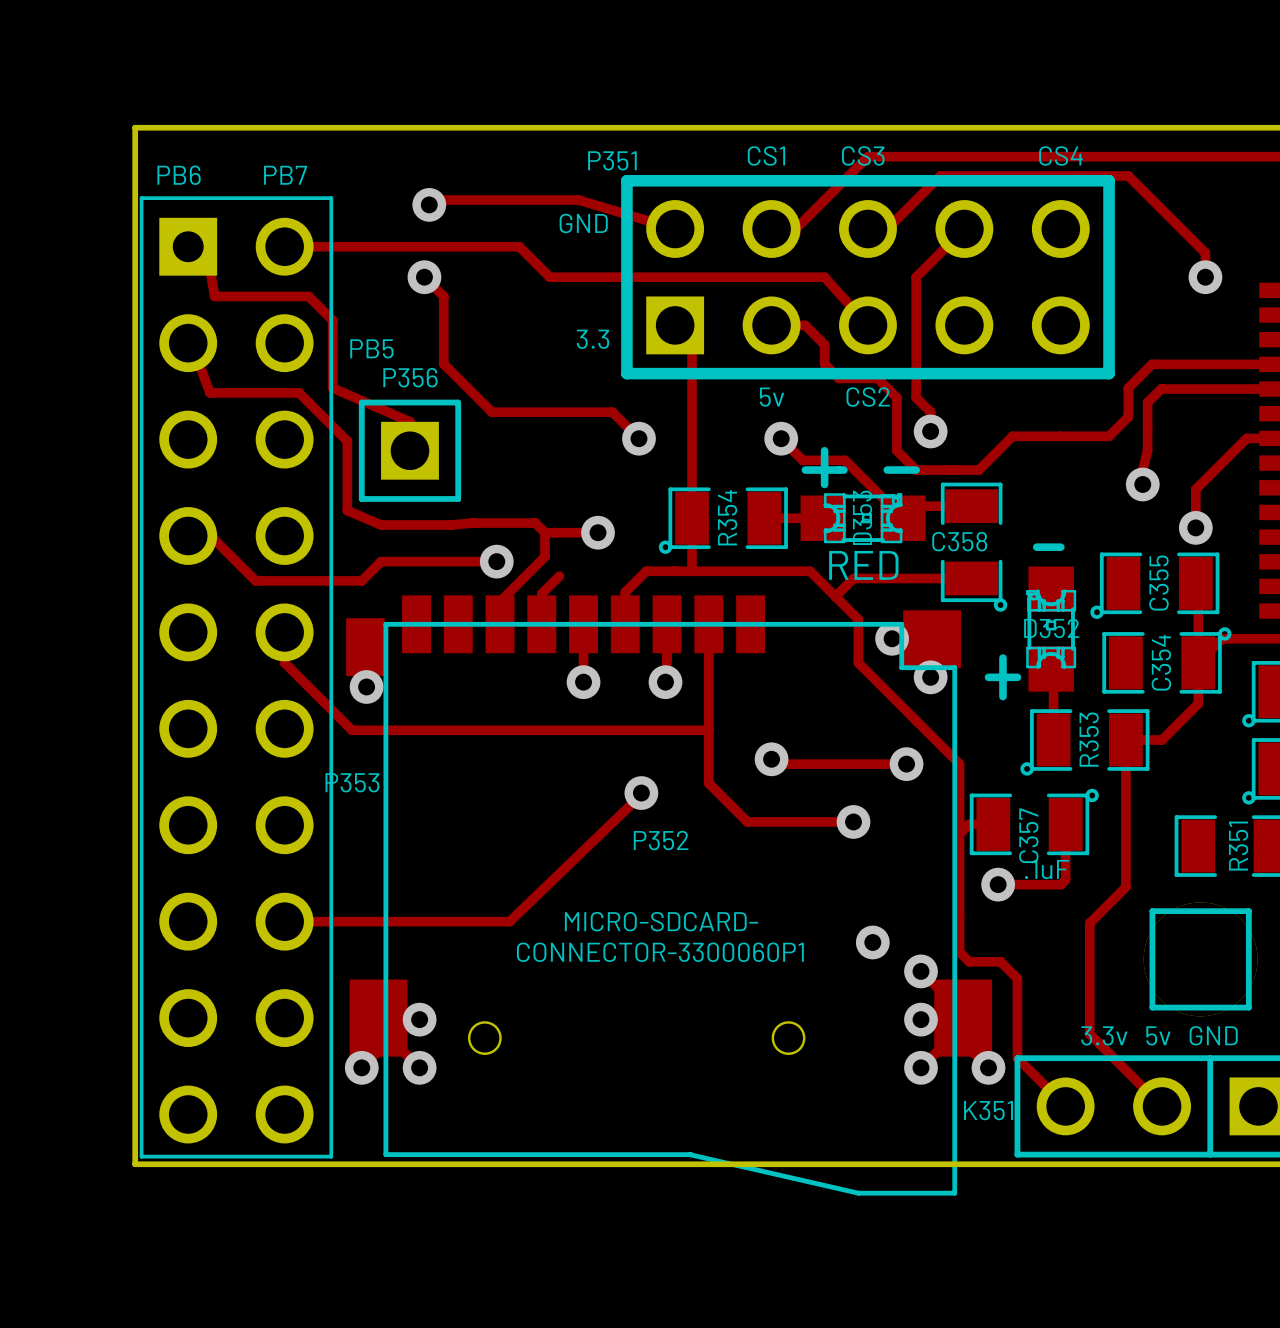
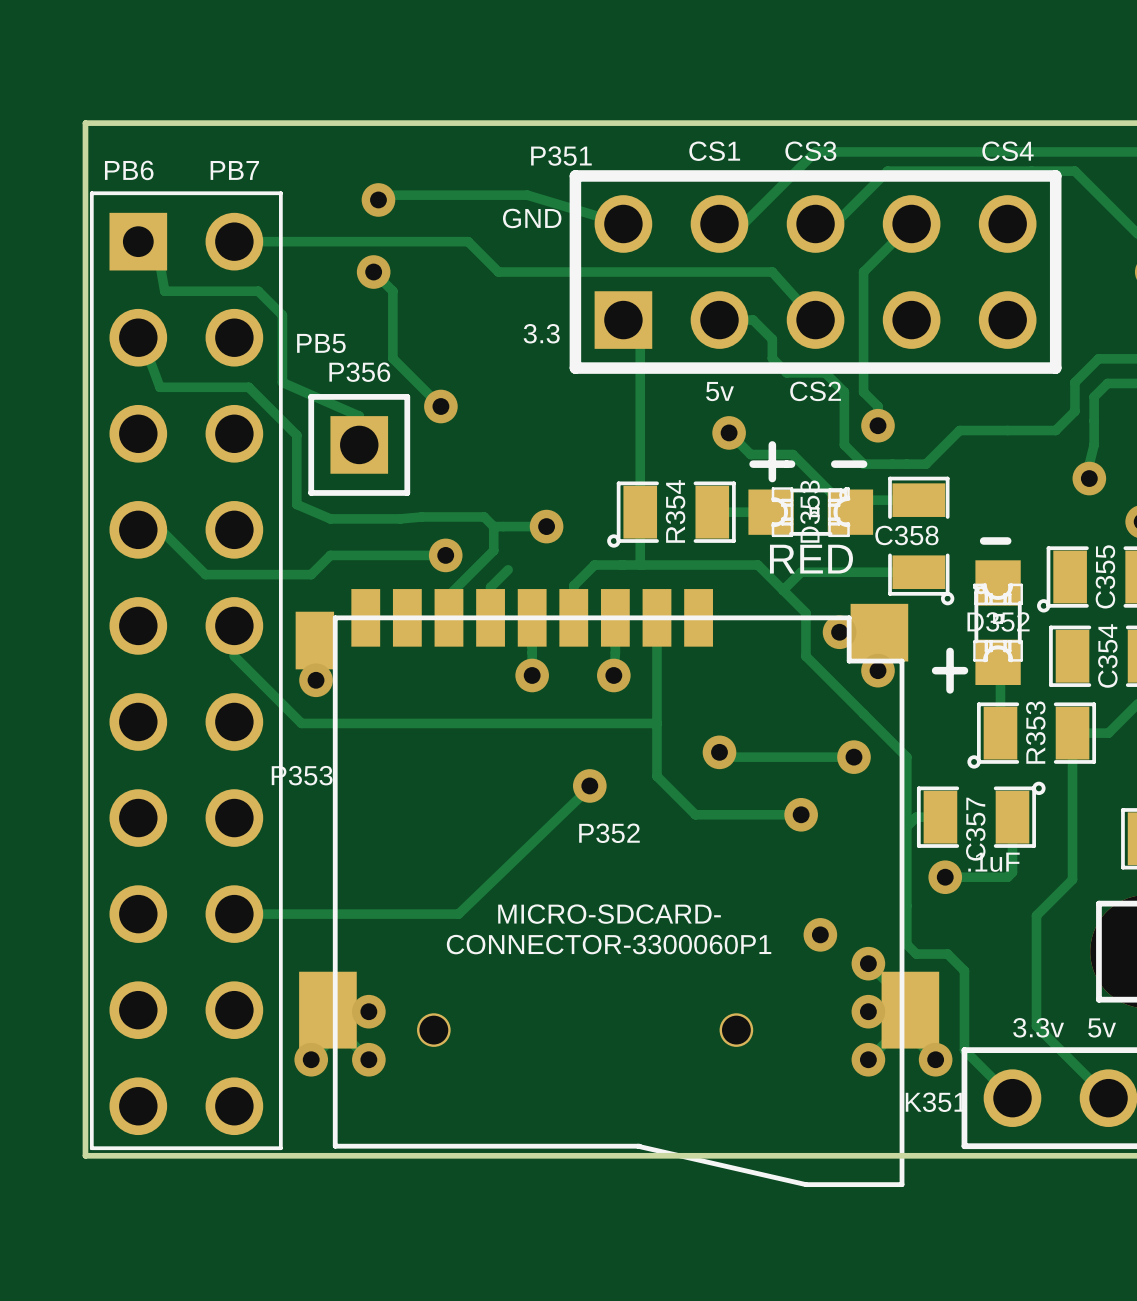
track: (491, 412) (612, 412) (638, 438) -> none
via position: (638, 438) -> (440, 406)

